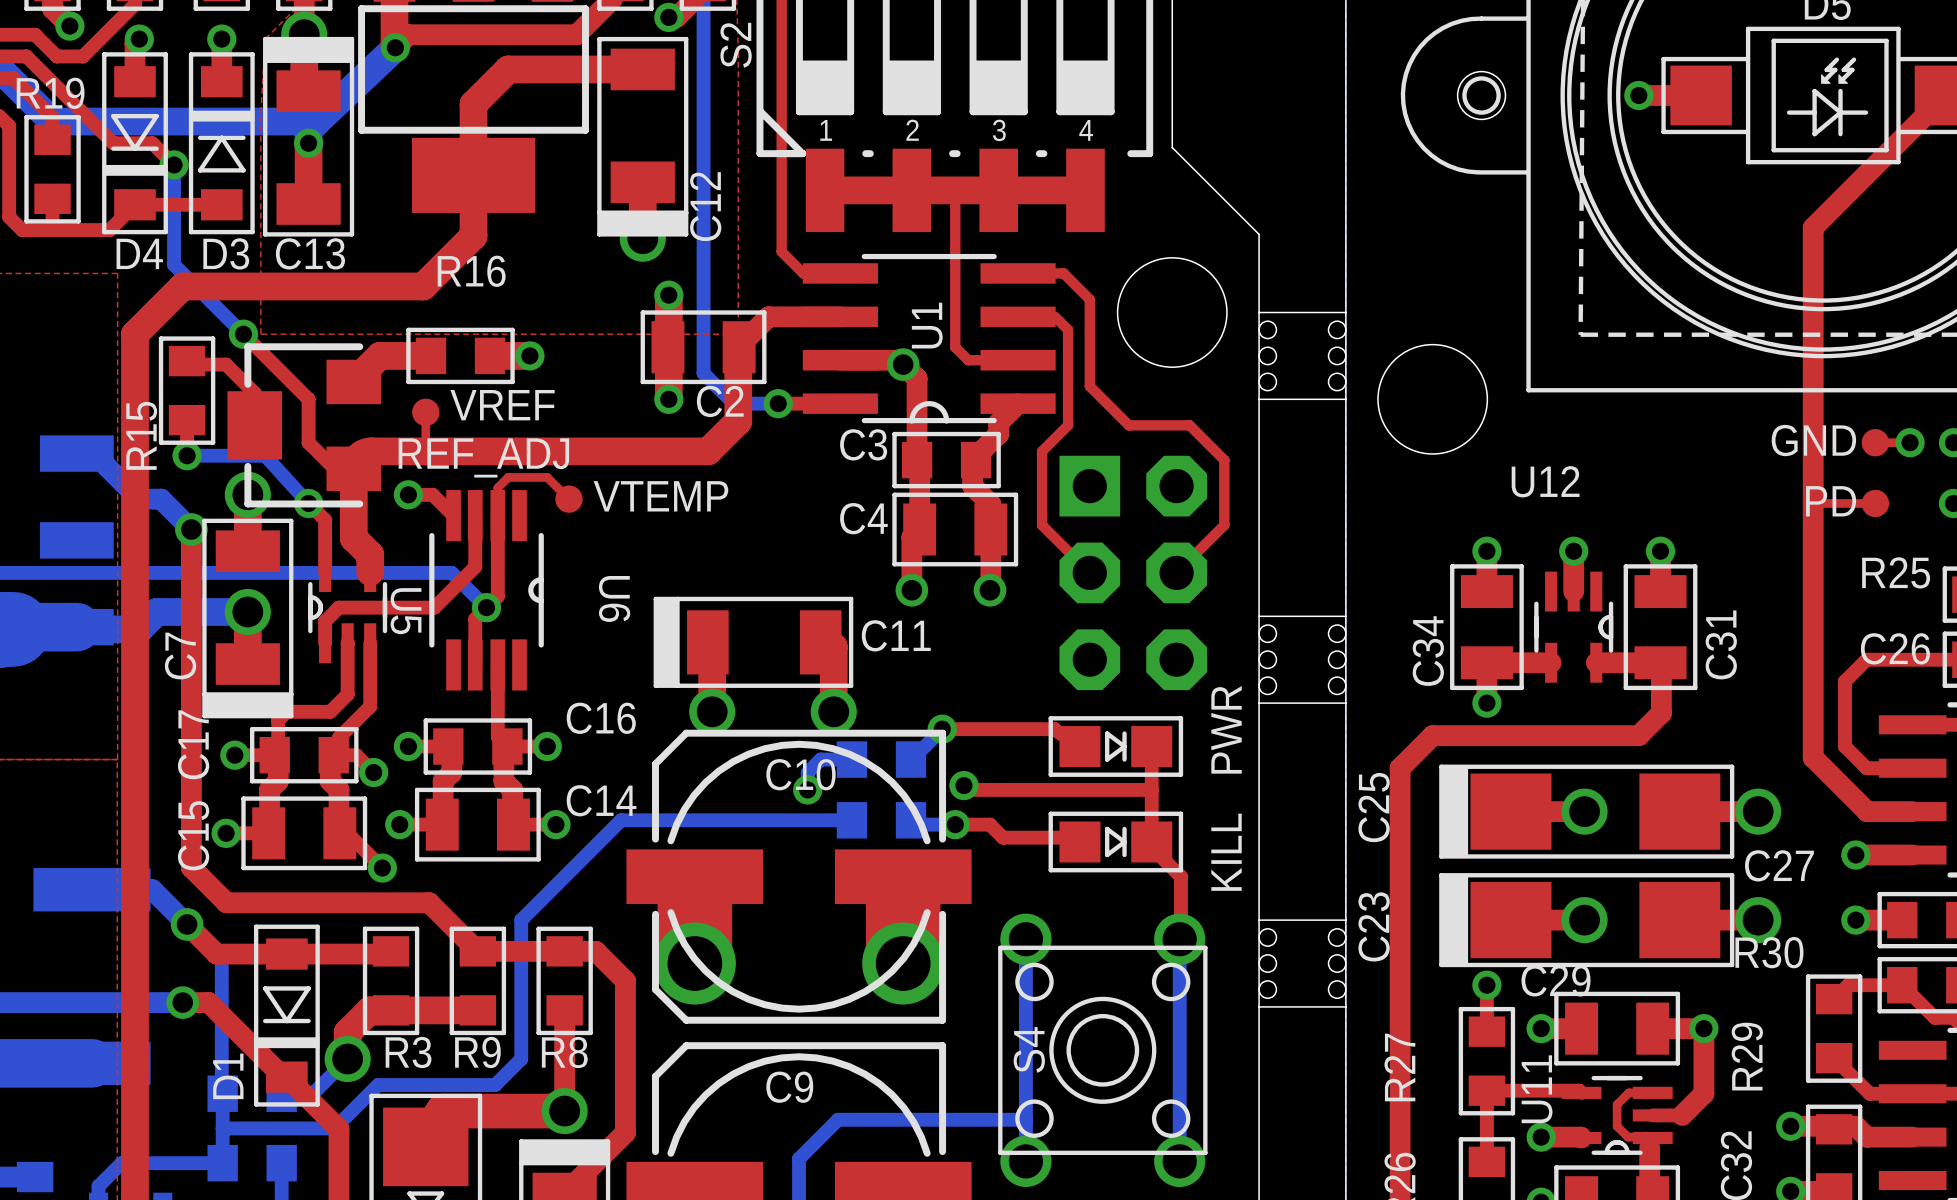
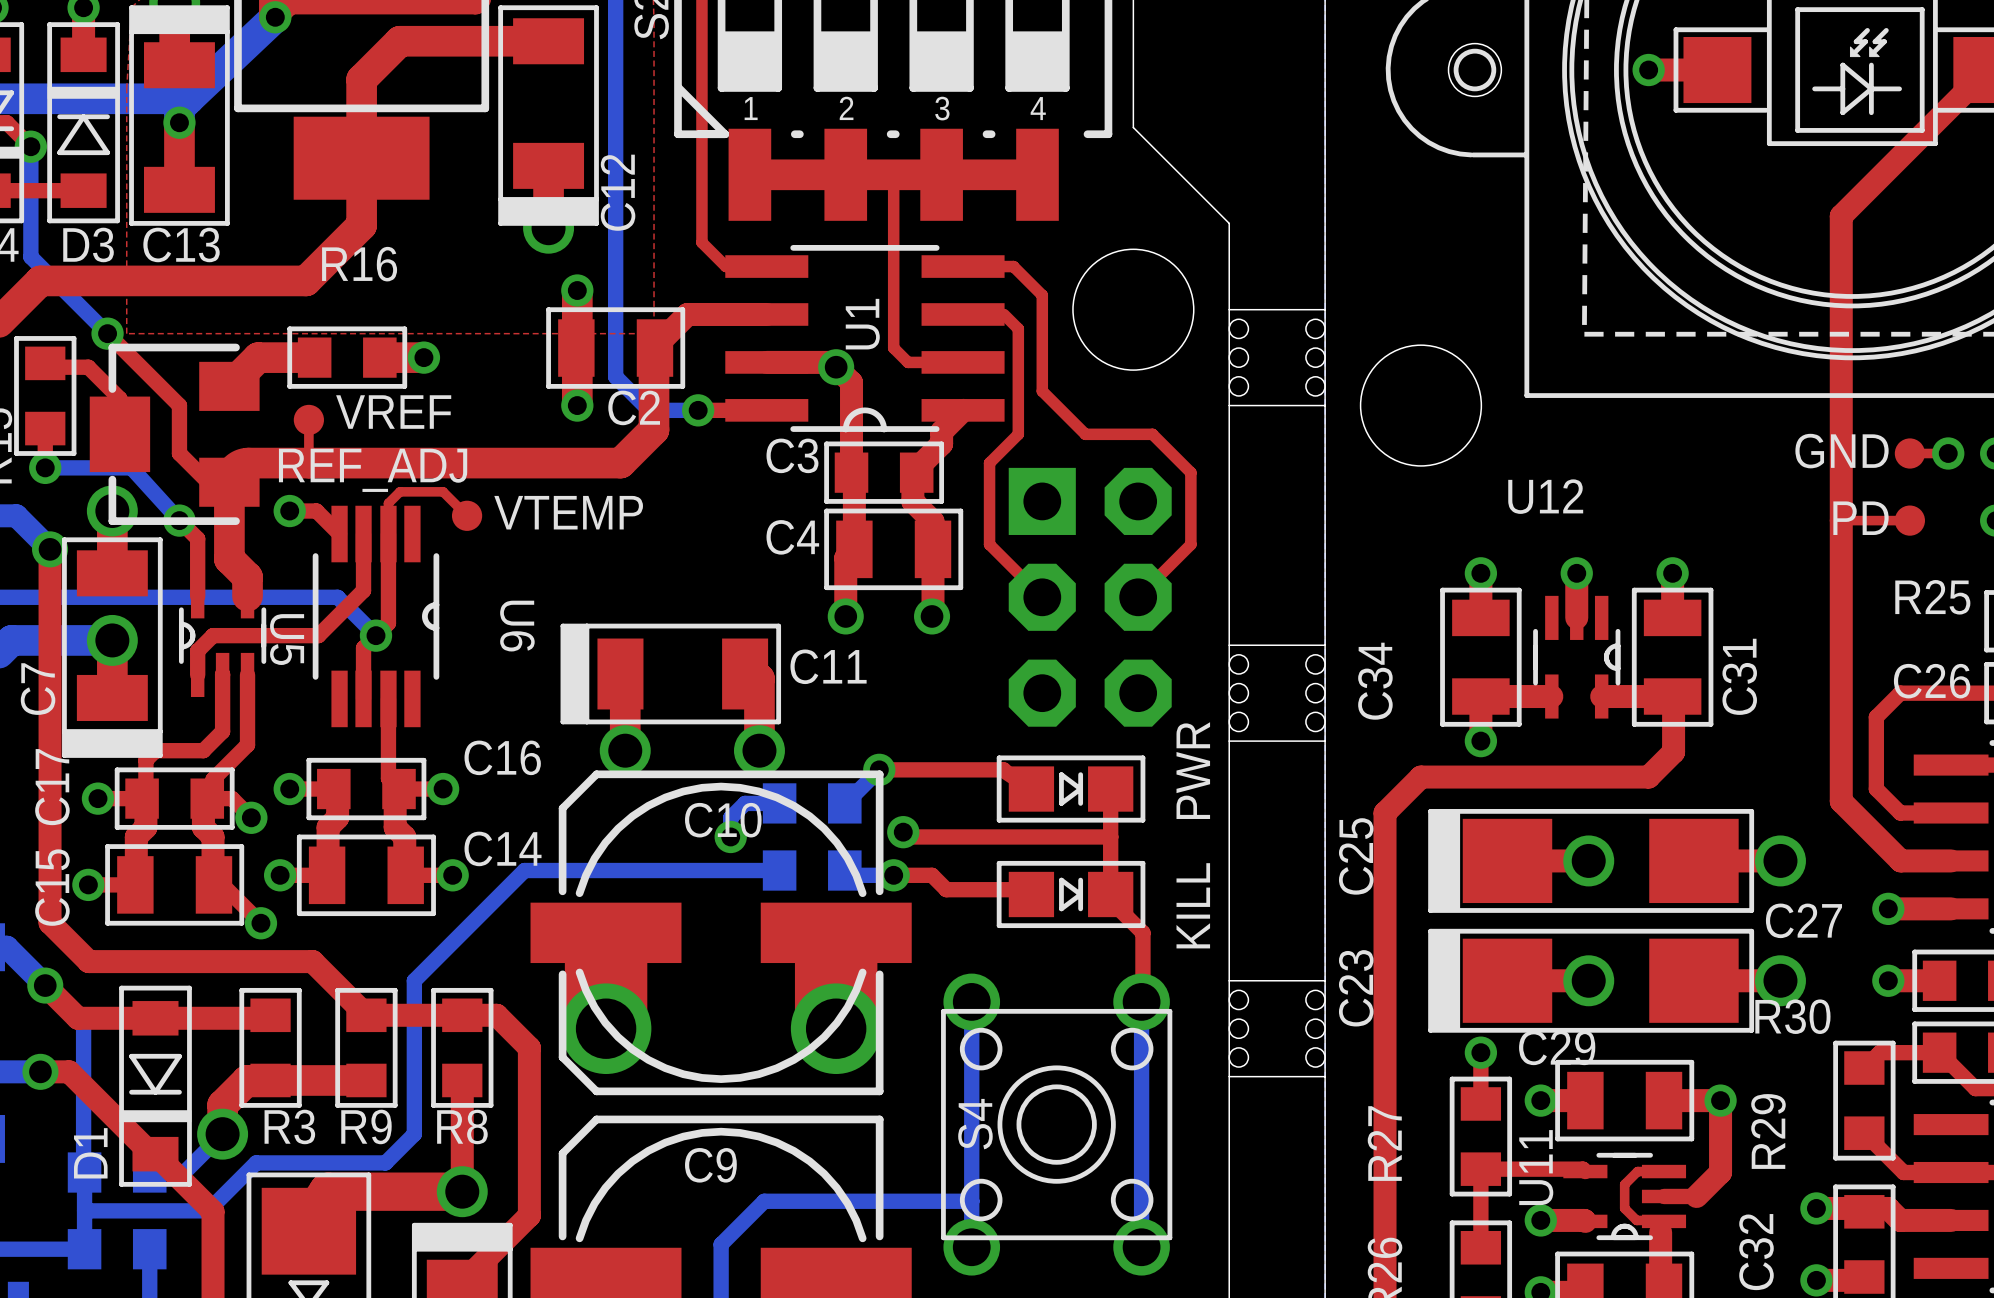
C34 name position: C34 (1428, 651) -> C34 (1375, 681)

